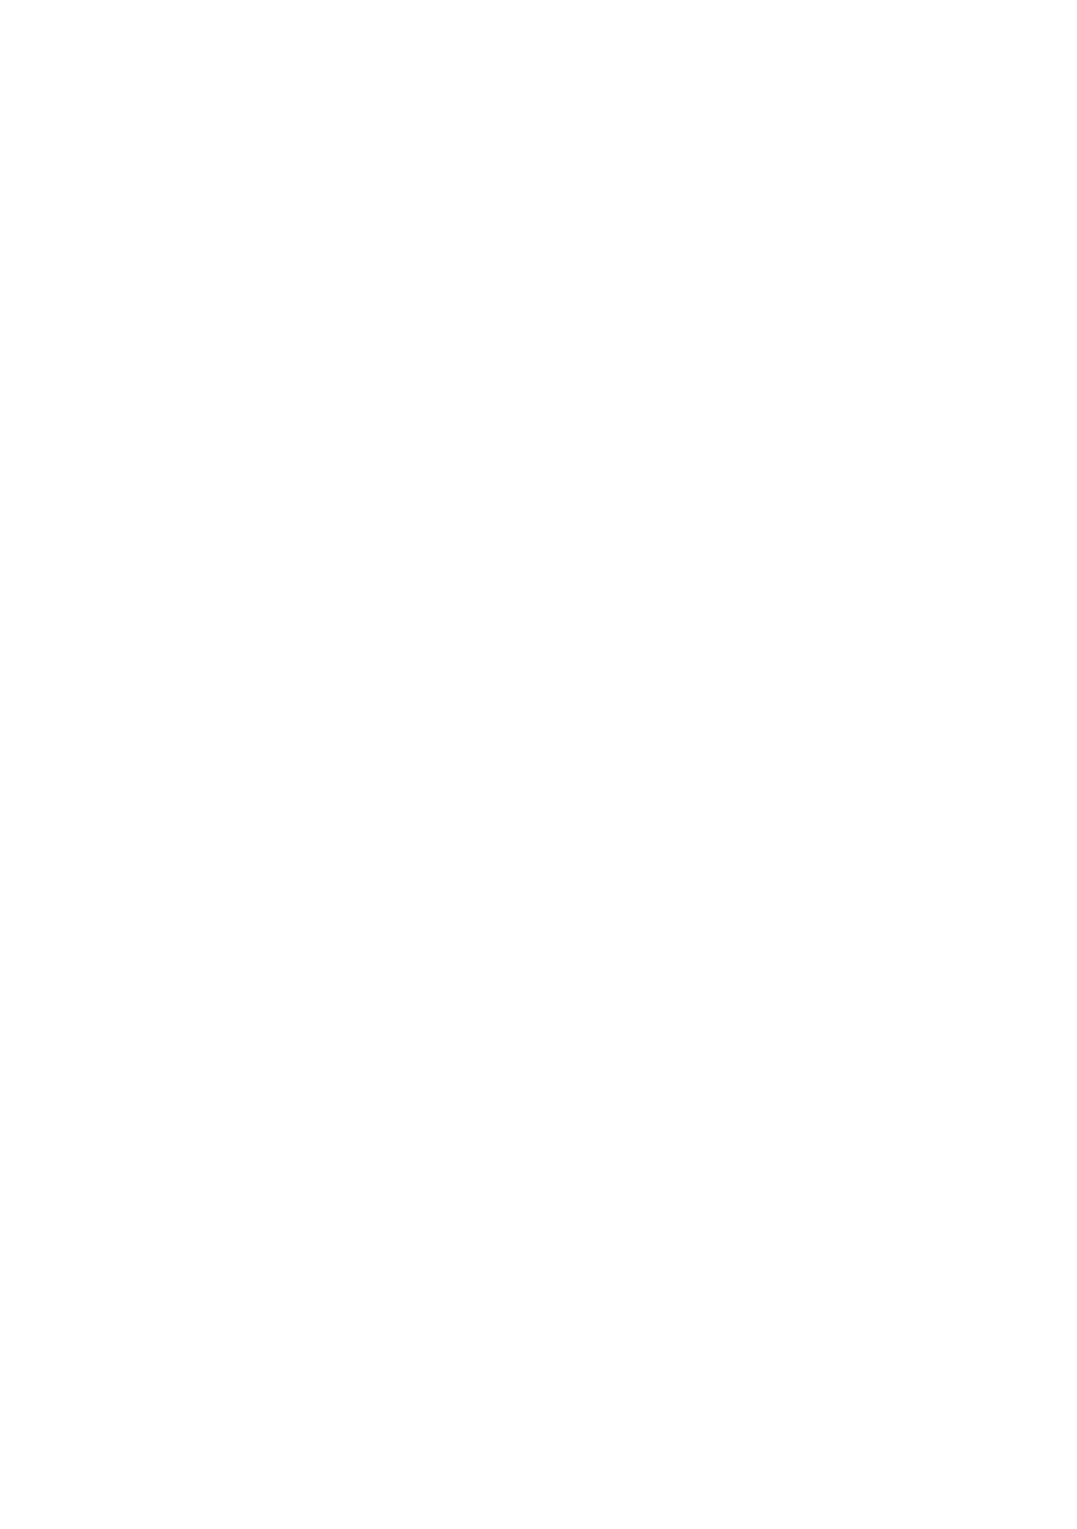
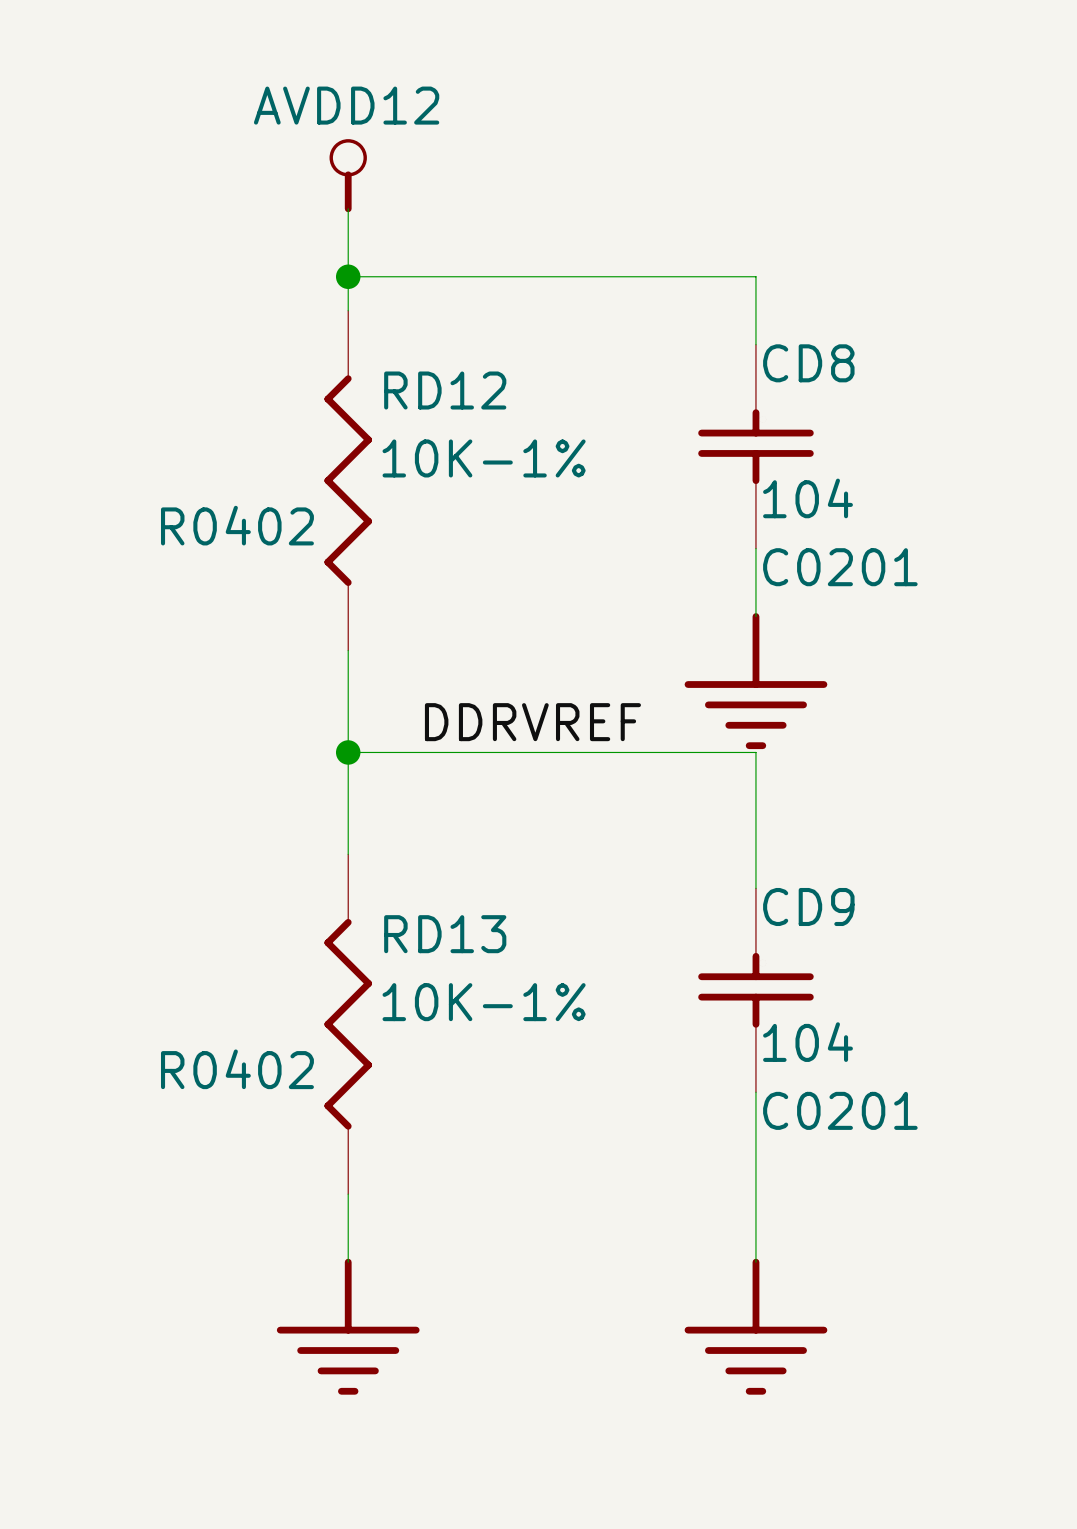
power symbol: none -> AVDD12 (348, 175)
wire: none -> (348, 208) (348, 310)
wire: none -> (348, 276) (755, 276) (755, 344)
junction: none -> (348, 276)
CD8: none -> 104 (755, 446)
RD12: none -> 10K-1% (348, 480)
wire: none -> (755, 548) (755, 616)
wire: none -> (348, 650) (348, 854)
power symbol: none -> (755, 681)
label: none -> DDRVREF (532, 722)
wire: none -> (348, 752) (755, 752) (755, 888)
junction: none -> (348, 752)
CD9: none -> 104 (755, 990)
RD13: none -> 10K-1% (348, 1024)
wire: none -> (755, 1092) (755, 1262)
wire: none -> (348, 1194) (348, 1262)
power symbol: none -> (348, 1326)
power symbol: none -> (755, 1326)

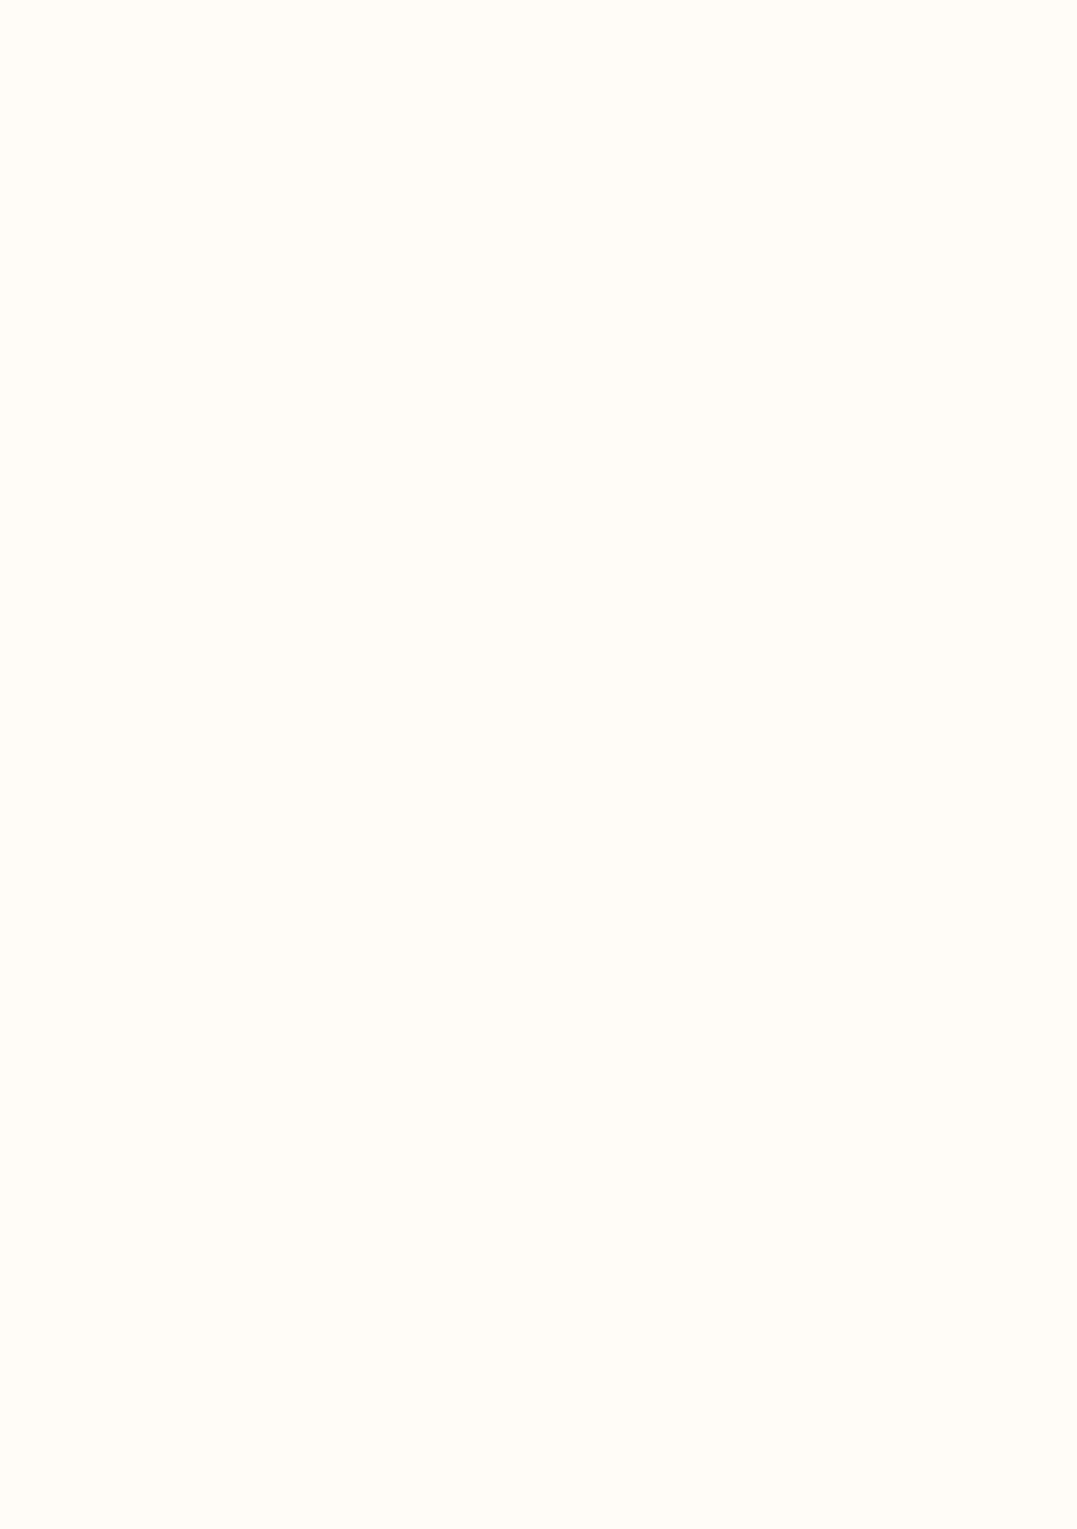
power symbol: AVDD12 (348, 175) -> none
wire: (348, 208) (348, 310) -> none
wire: (348, 276) (755, 276) (755, 344) -> none
junction: (348, 276) -> none
CD8: 104 (755, 446) -> none
RD12: 10K-1% (348, 480) -> none
wire: (755, 548) (755, 616) -> none
wire: (348, 650) (348, 854) -> none
power symbol: (755, 681) -> none
label: DDRVREF (532, 722) -> none
wire: (348, 752) (755, 752) (755, 888) -> none
junction: (348, 752) -> none
CD9: 104 (755, 990) -> none
RD13: 10K-1% (348, 1024) -> none
wire: (755, 1092) (755, 1262) -> none
wire: (348, 1194) (348, 1262) -> none
power symbol: (348, 1326) -> none
power symbol: (755, 1326) -> none

